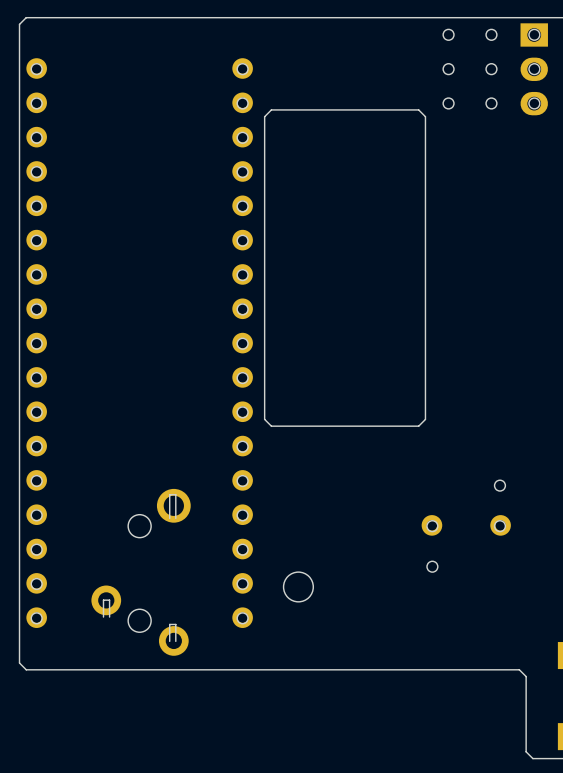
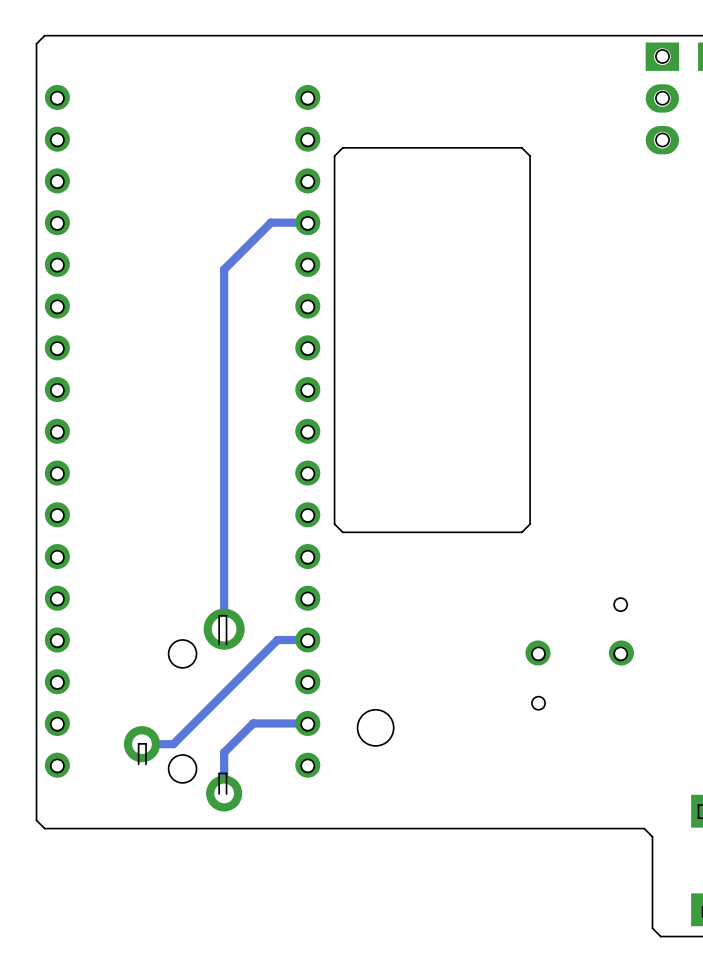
round board edge: [442, 28, 455, 41] -> none
round board edge: [485, 28, 498, 41] -> none
round board edge: [442, 63, 455, 76] -> none
round board edge: [485, 63, 498, 76] -> none
round board edge: [442, 97, 455, 110] -> none
round board edge: [485, 97, 498, 110] -> none
track: none -> (307, 222) (270, 222) (224, 269) (224, 629)
track: none -> (307, 640) (277, 640) (173, 744) (141, 744)
track: none -> (307, 723) (253, 723) (224, 752) (224, 793)

